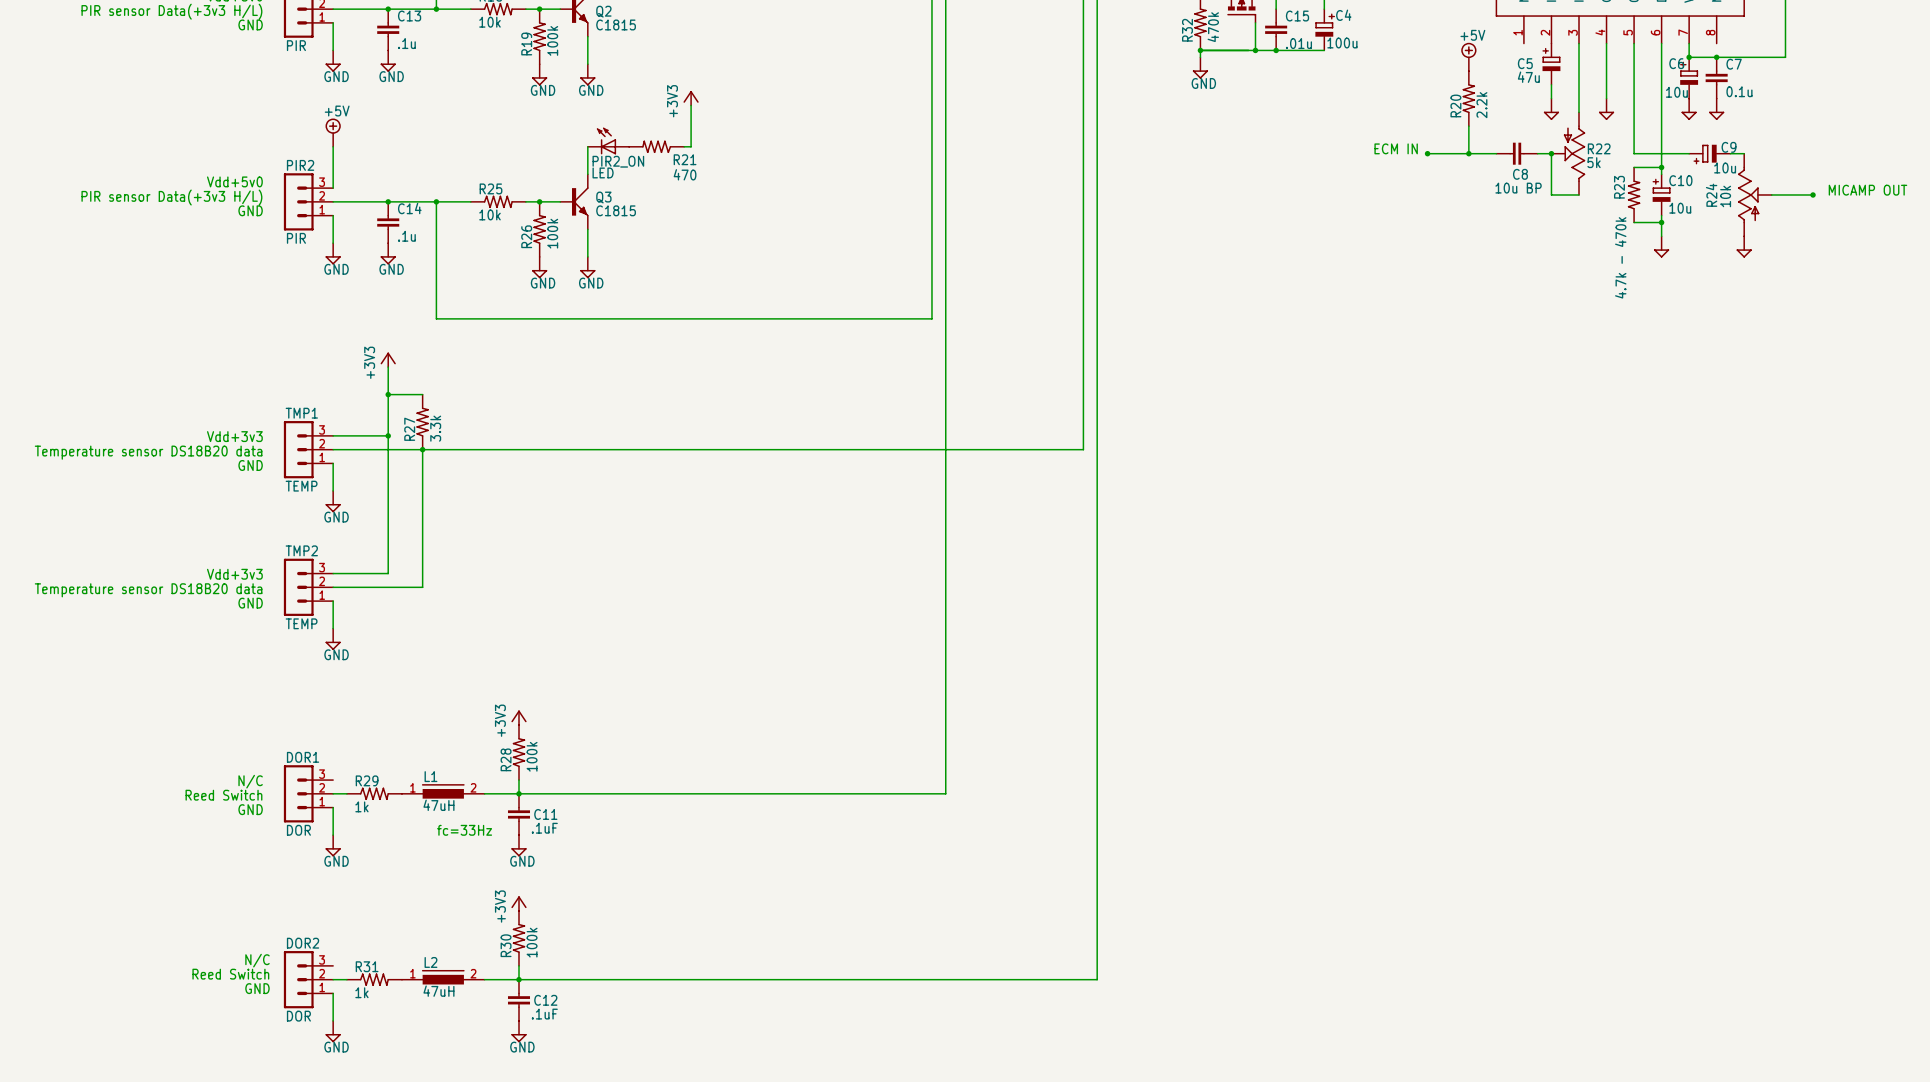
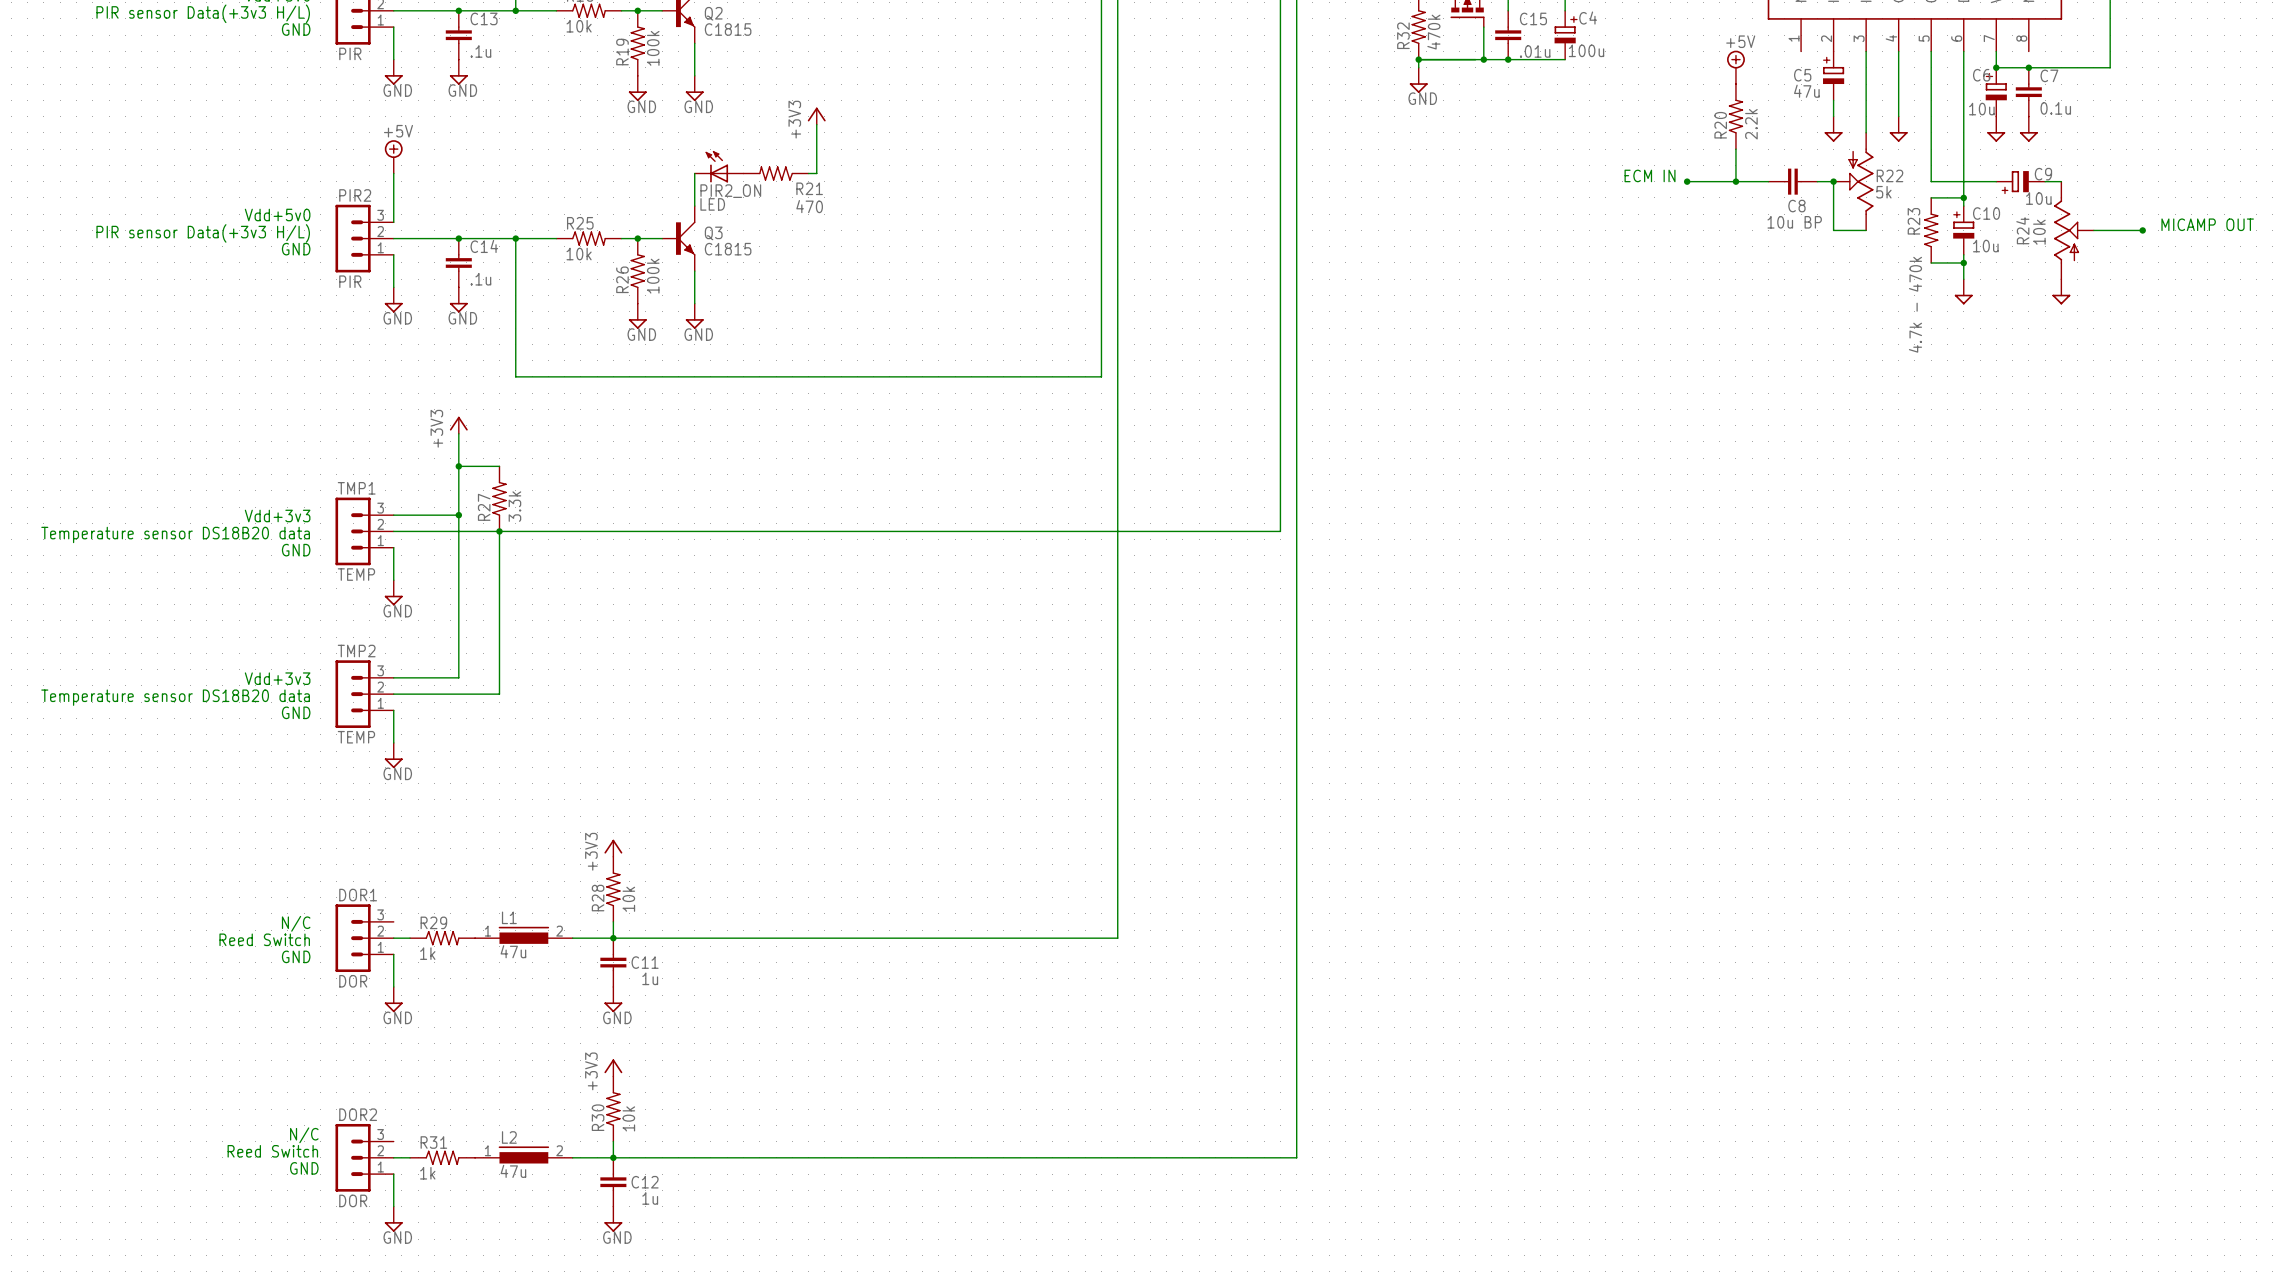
R28 value: 100k (532, 756) -> 10k (628, 899)
L1 value: 47uH (438, 805) -> 47u (513, 951)
C11 value: .1uF (544, 828) -> 1u (650, 978)
text: fc=33Hz (464, 830) -> none
R30 value: 100k (532, 942) -> 10k (628, 1118)
L2 value: 47uH (438, 991) -> 47u (513, 1171)
C12 value: .1uF (544, 1014) -> 1u (650, 1198)

